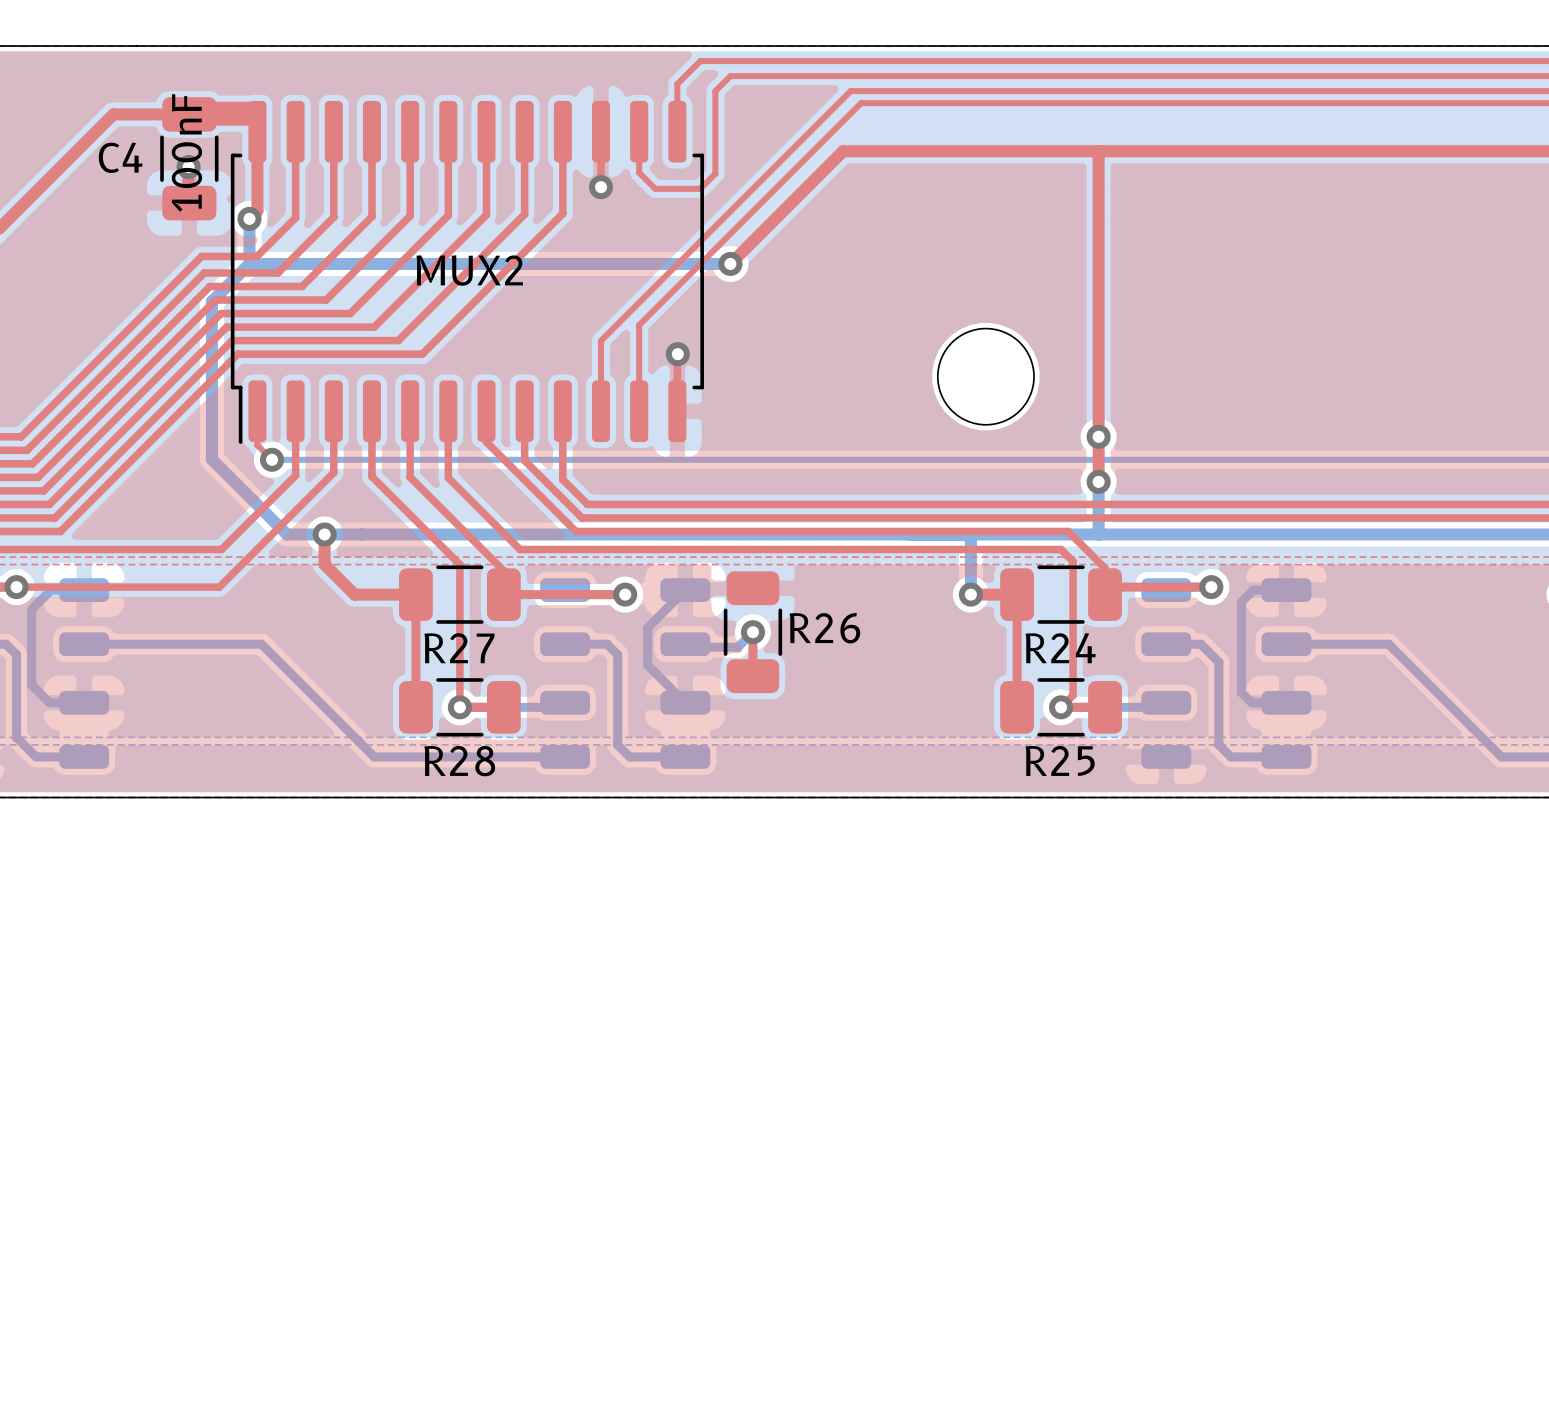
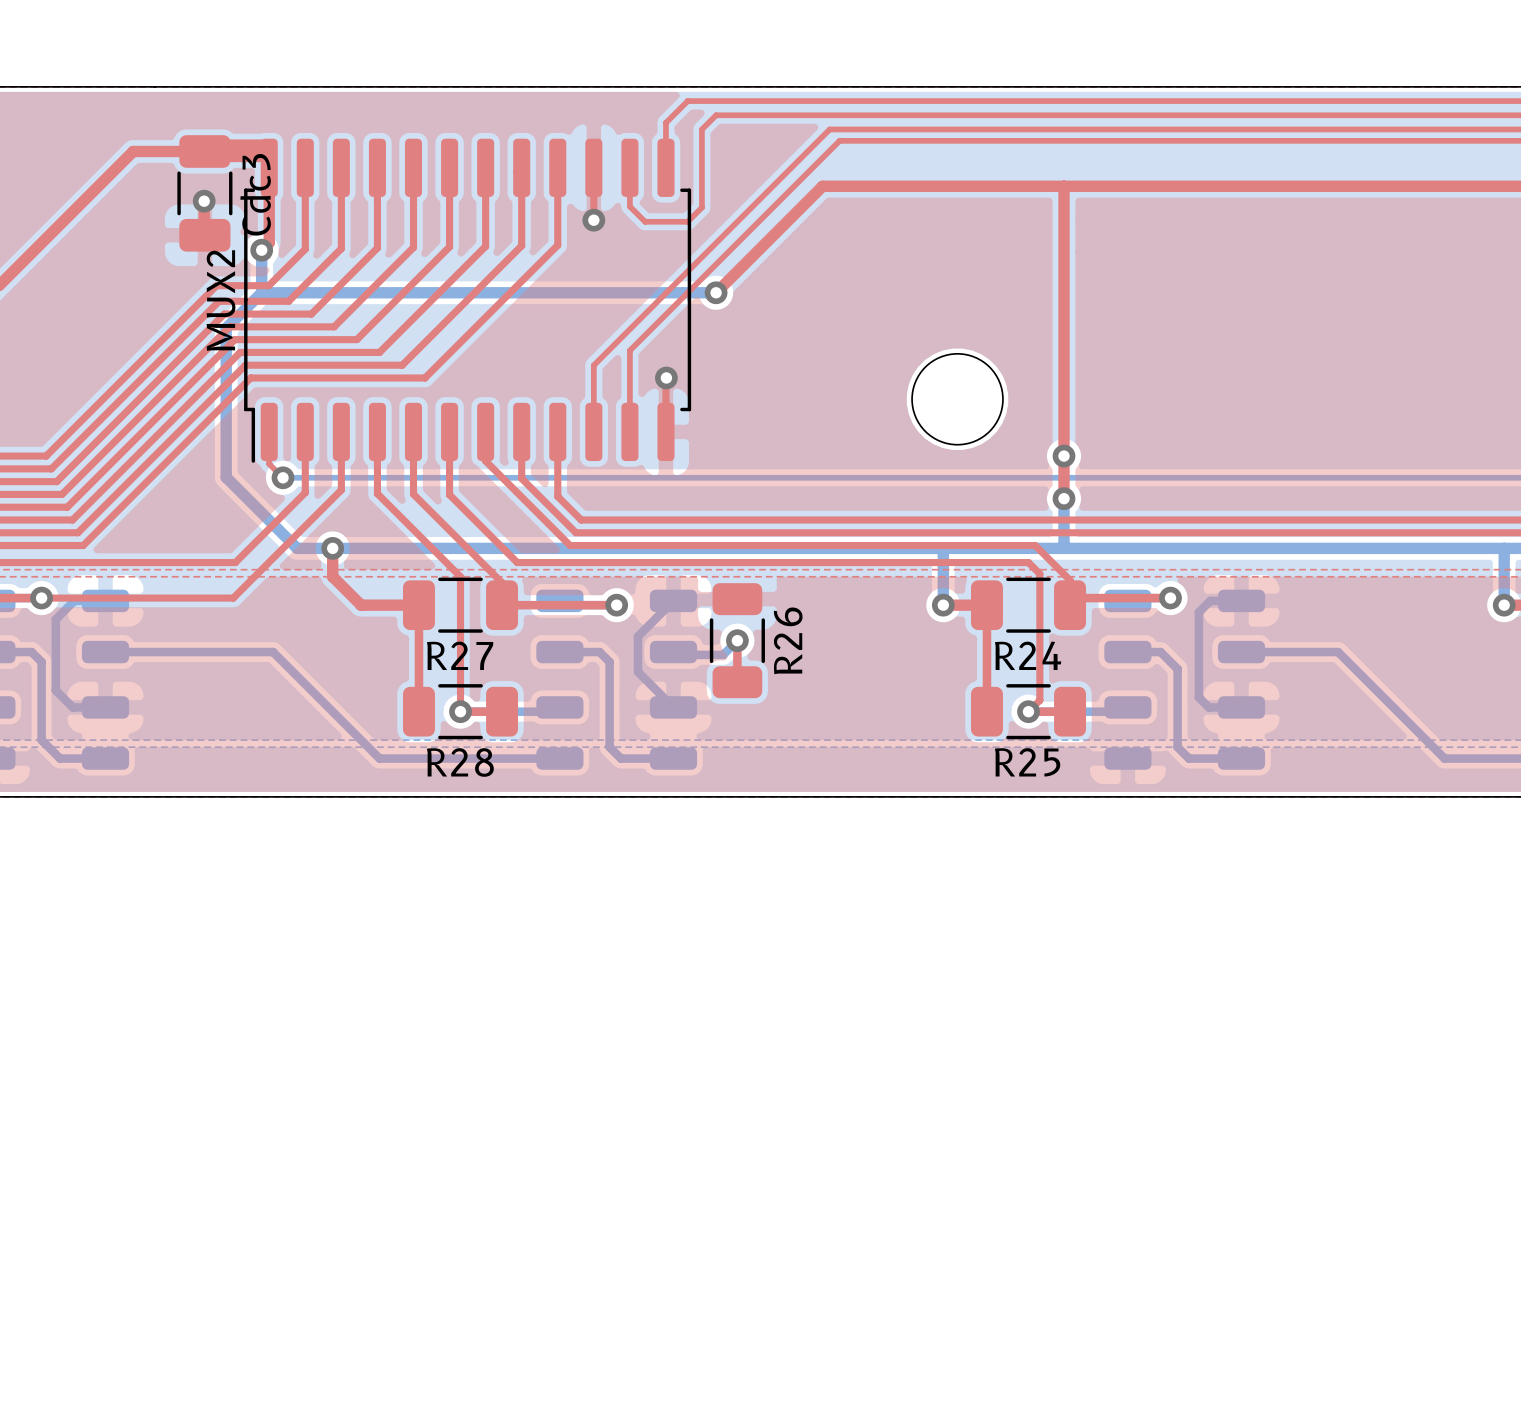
C4 value: 100nF (186, 152) -> none
C4 name: C4 (120, 157) -> Cdc3 (255, 194)
MUX2 name rotation: 0° (469, 270) -> 90° counterclockwise (221, 300)
MUX2 name position: MUX2 (469, 270) -> MUX2 (221, 300)
R26 name rotation: 0° (824, 628) -> 90° counterclockwise (788, 640)

